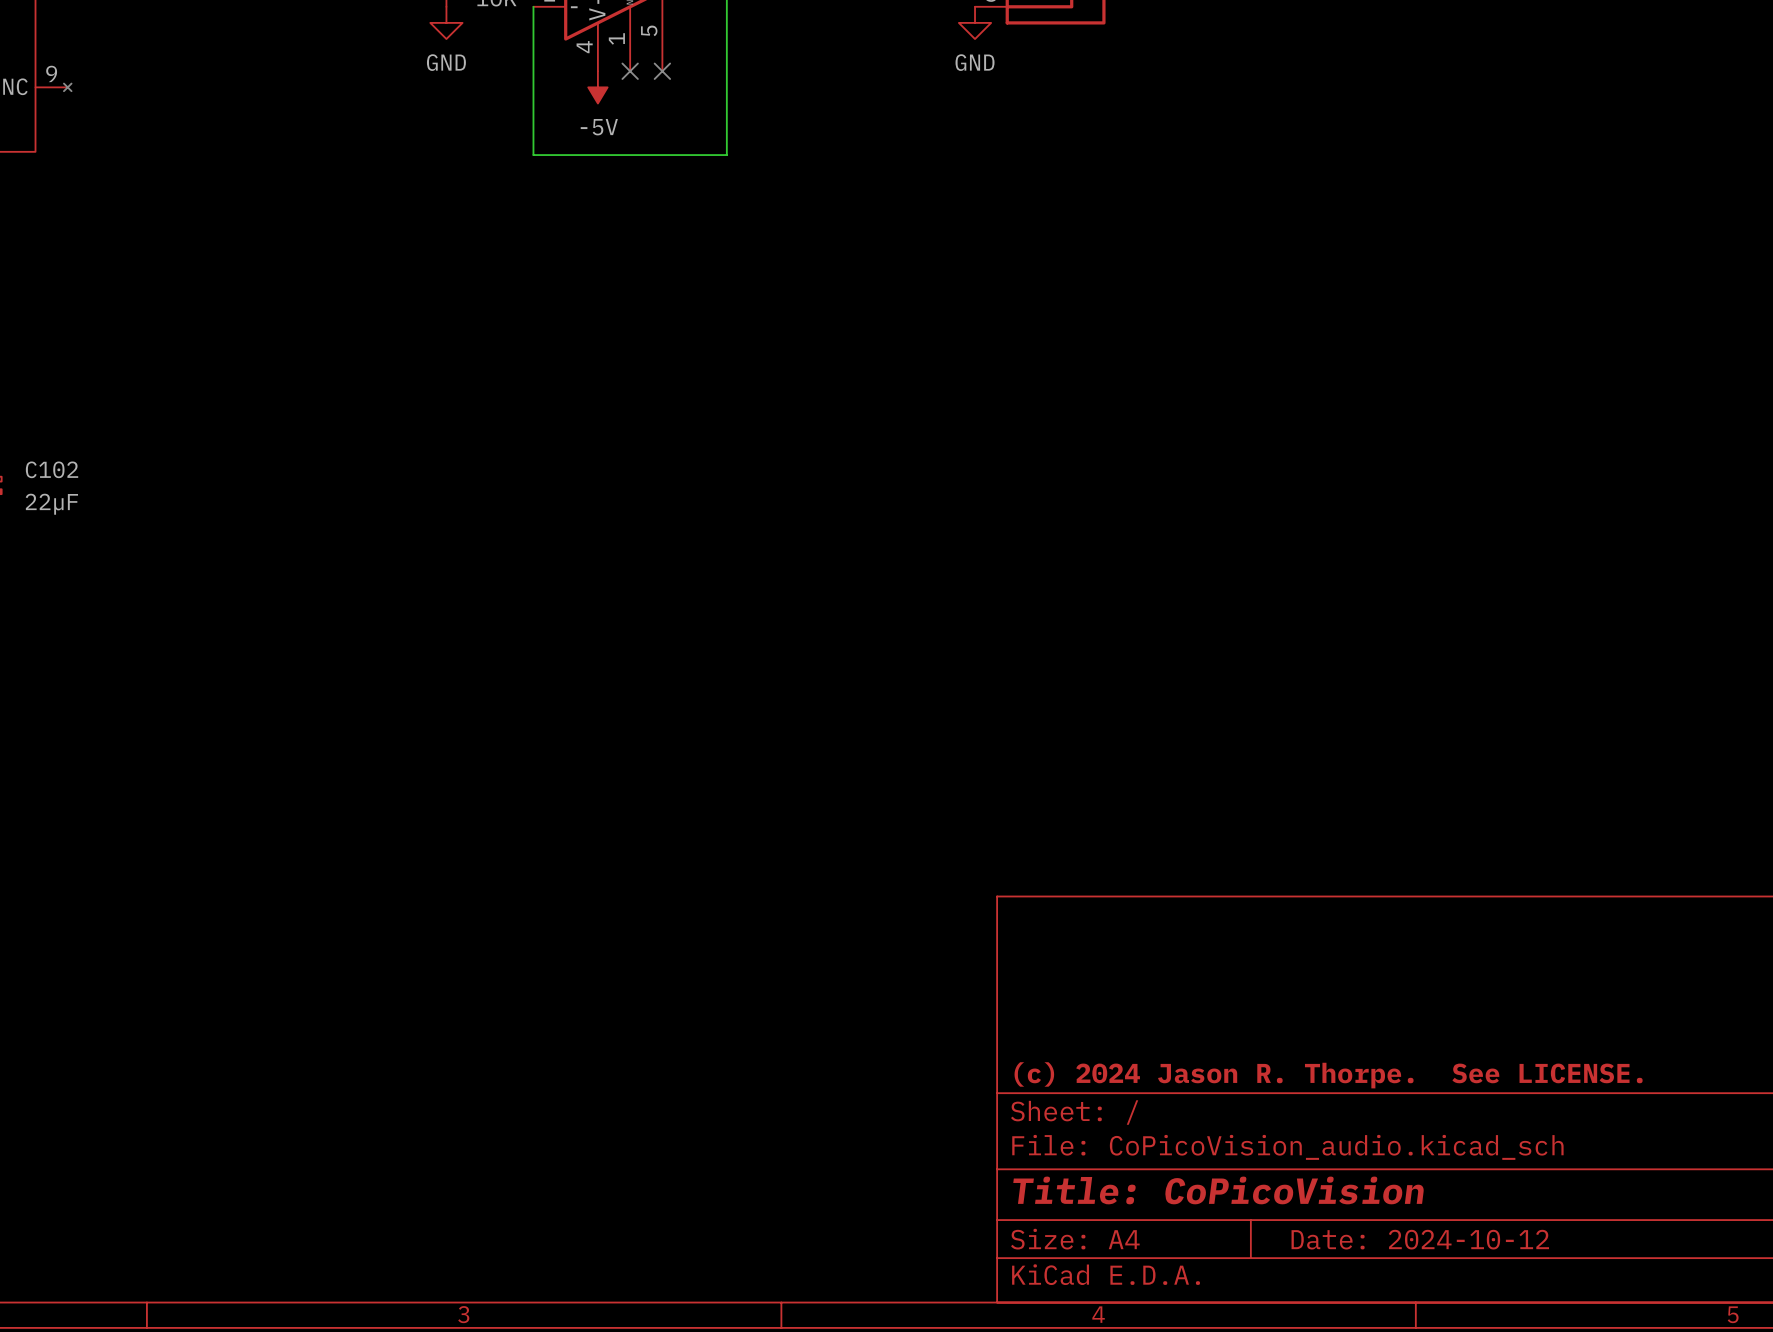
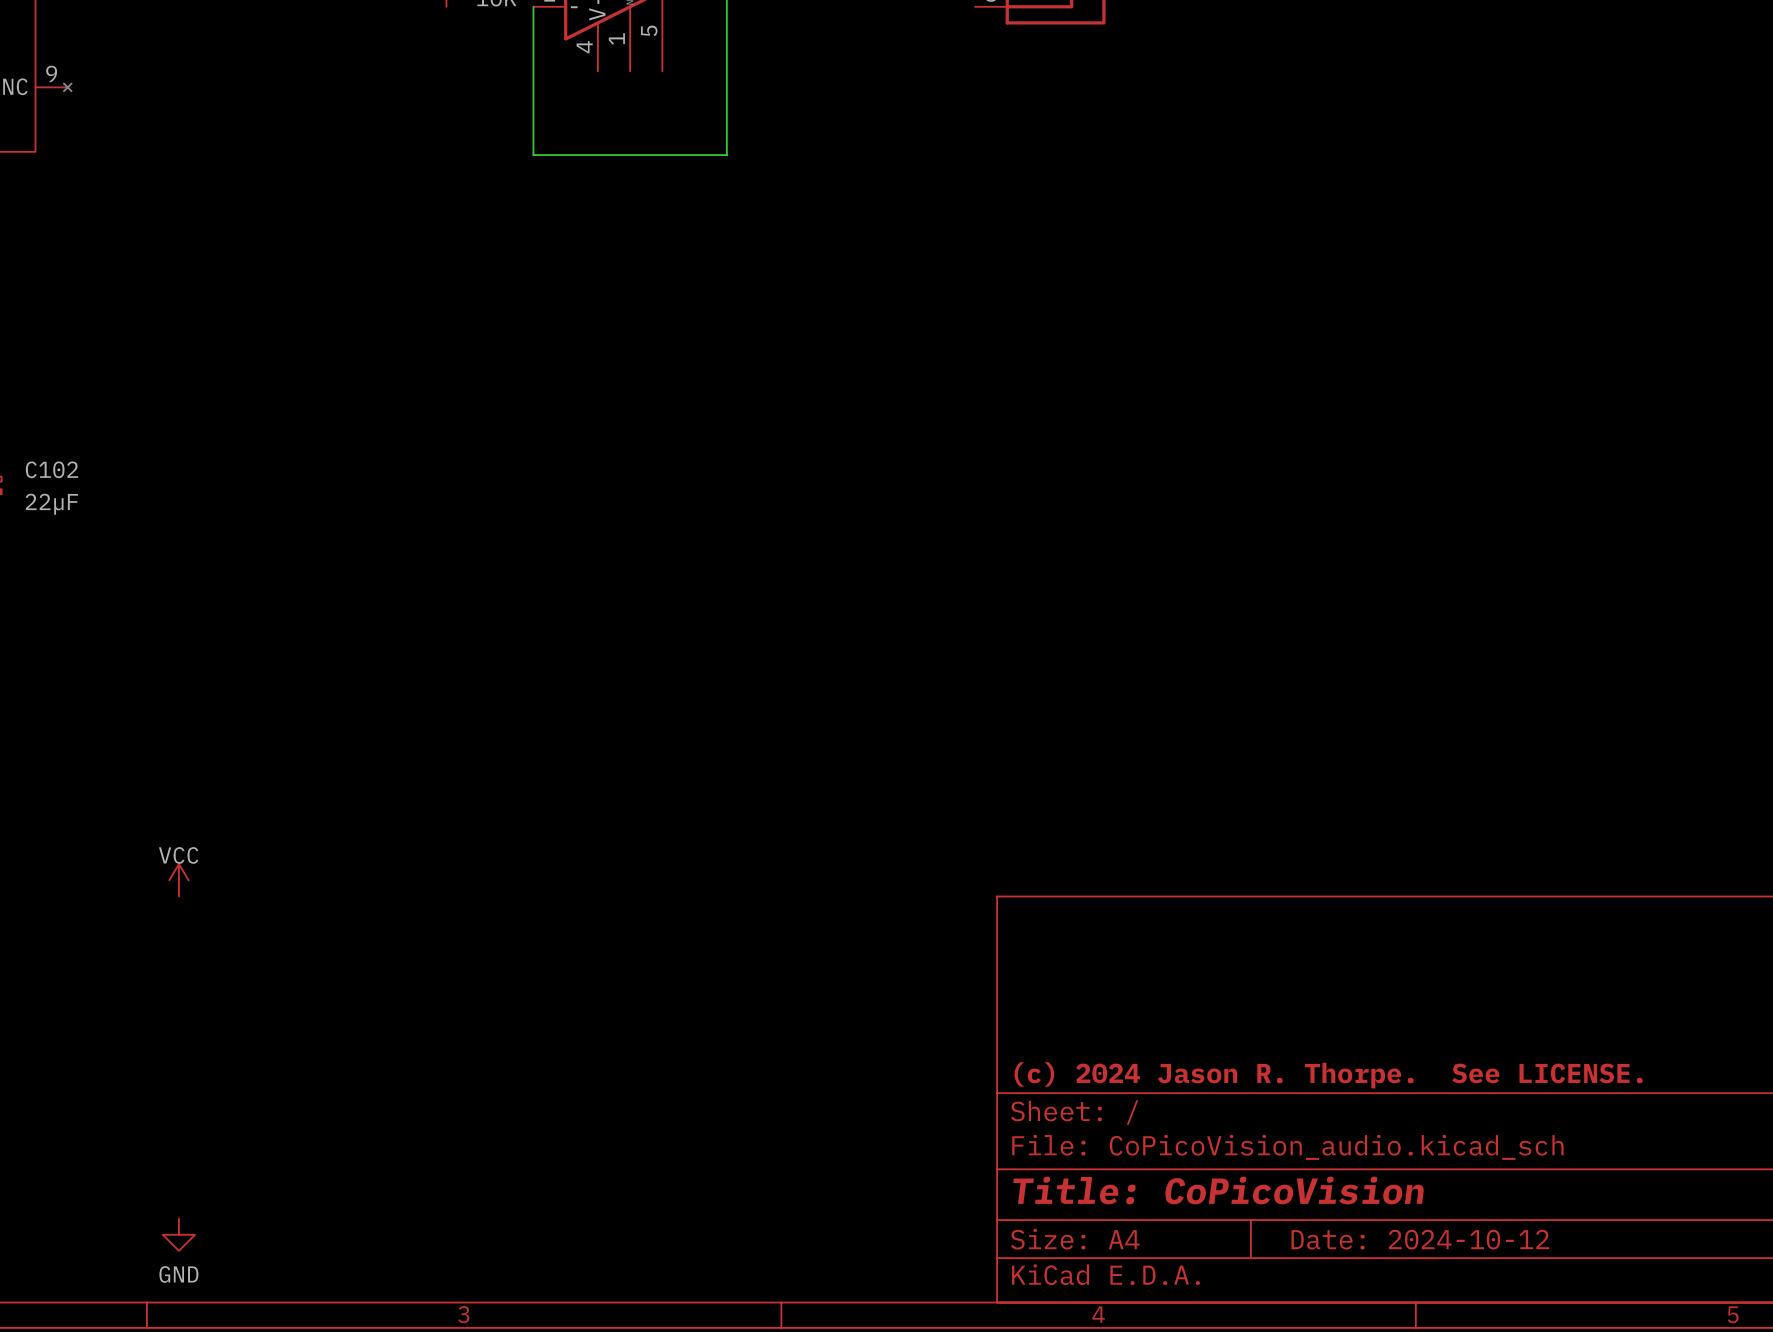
power symbol: GND (446, 22) -> none
power symbol: GND (975, 22) -> none
no-connect mark: (630, 71) -> none
no-connect mark: (662, 71) -> none
power symbol: -5V (597, 87) -> none
power symbol: none -> VCC (178, 880)
power symbol: none -> GND (178, 1234)

